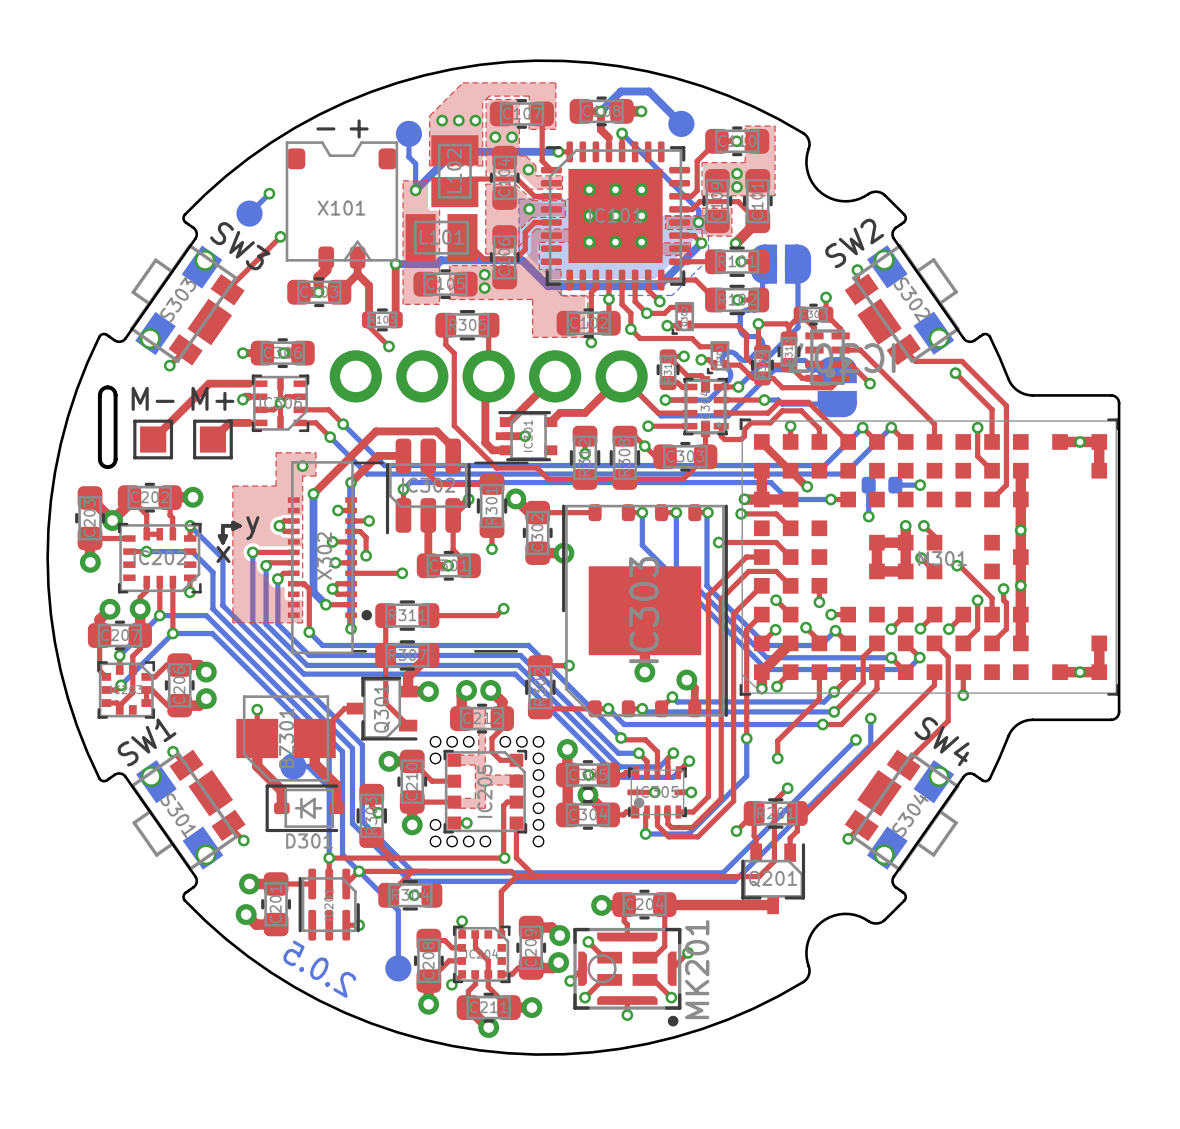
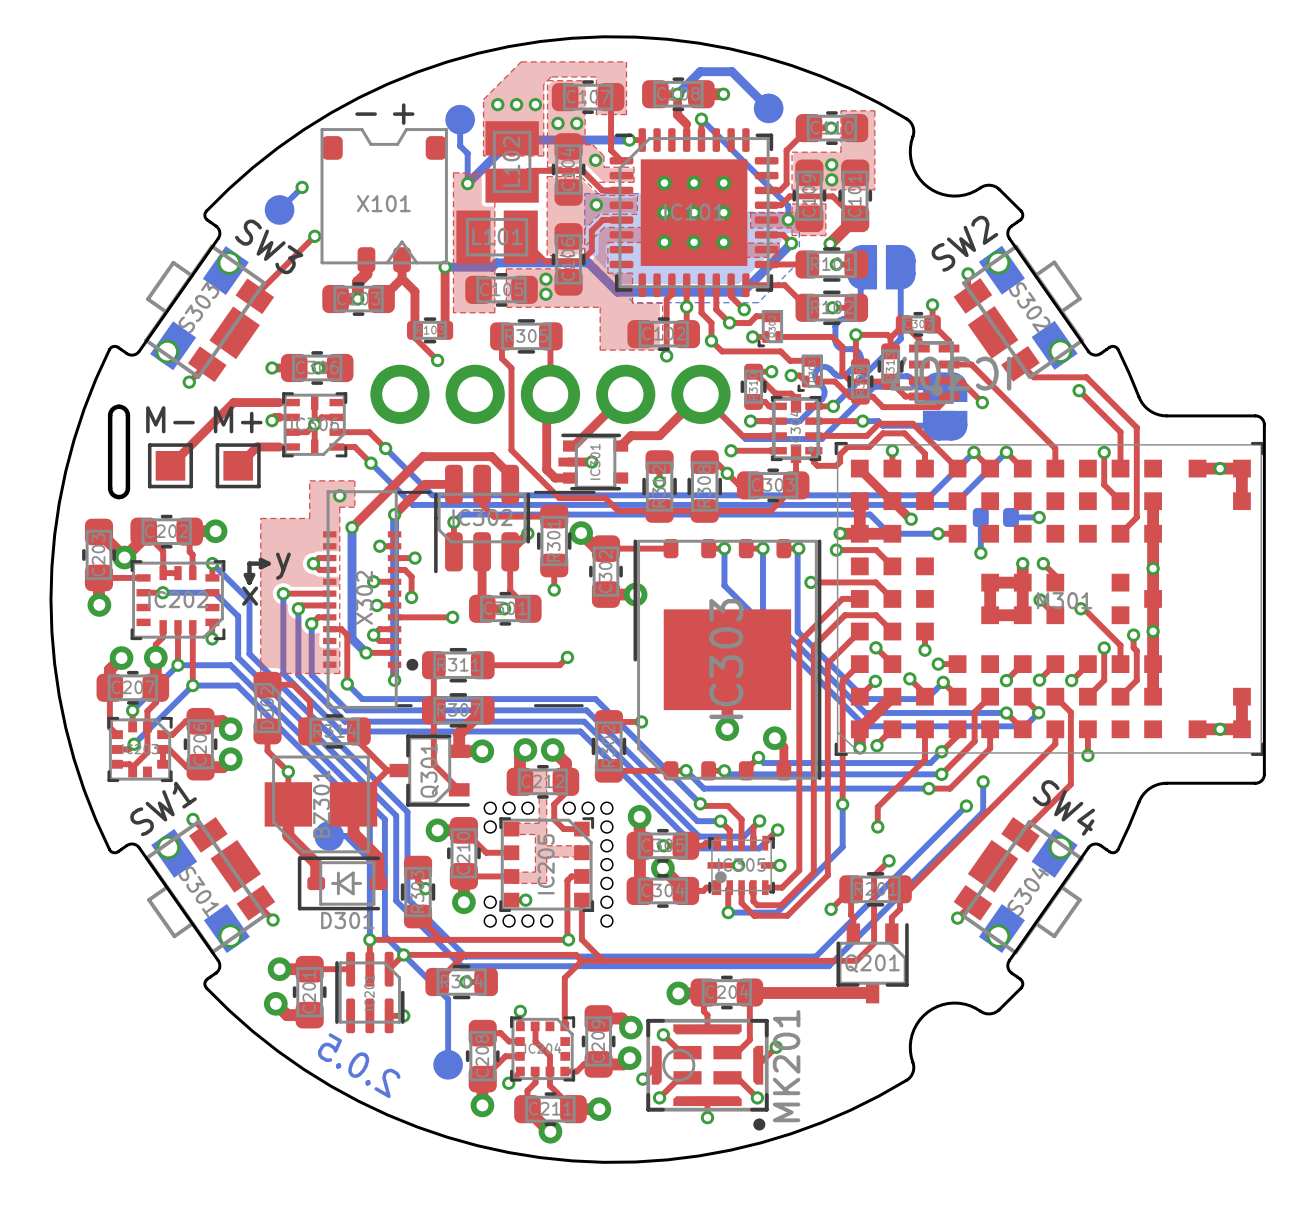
top track: none -> (267, 684) (293, 684) (310, 701) (310, 731)
part: none -> (267, 708)
top track: none -> (267, 731) (267, 750) (288, 771)
part: none -> (334, 731)
top track: none -> (358, 731) (358, 742) (387, 770)

